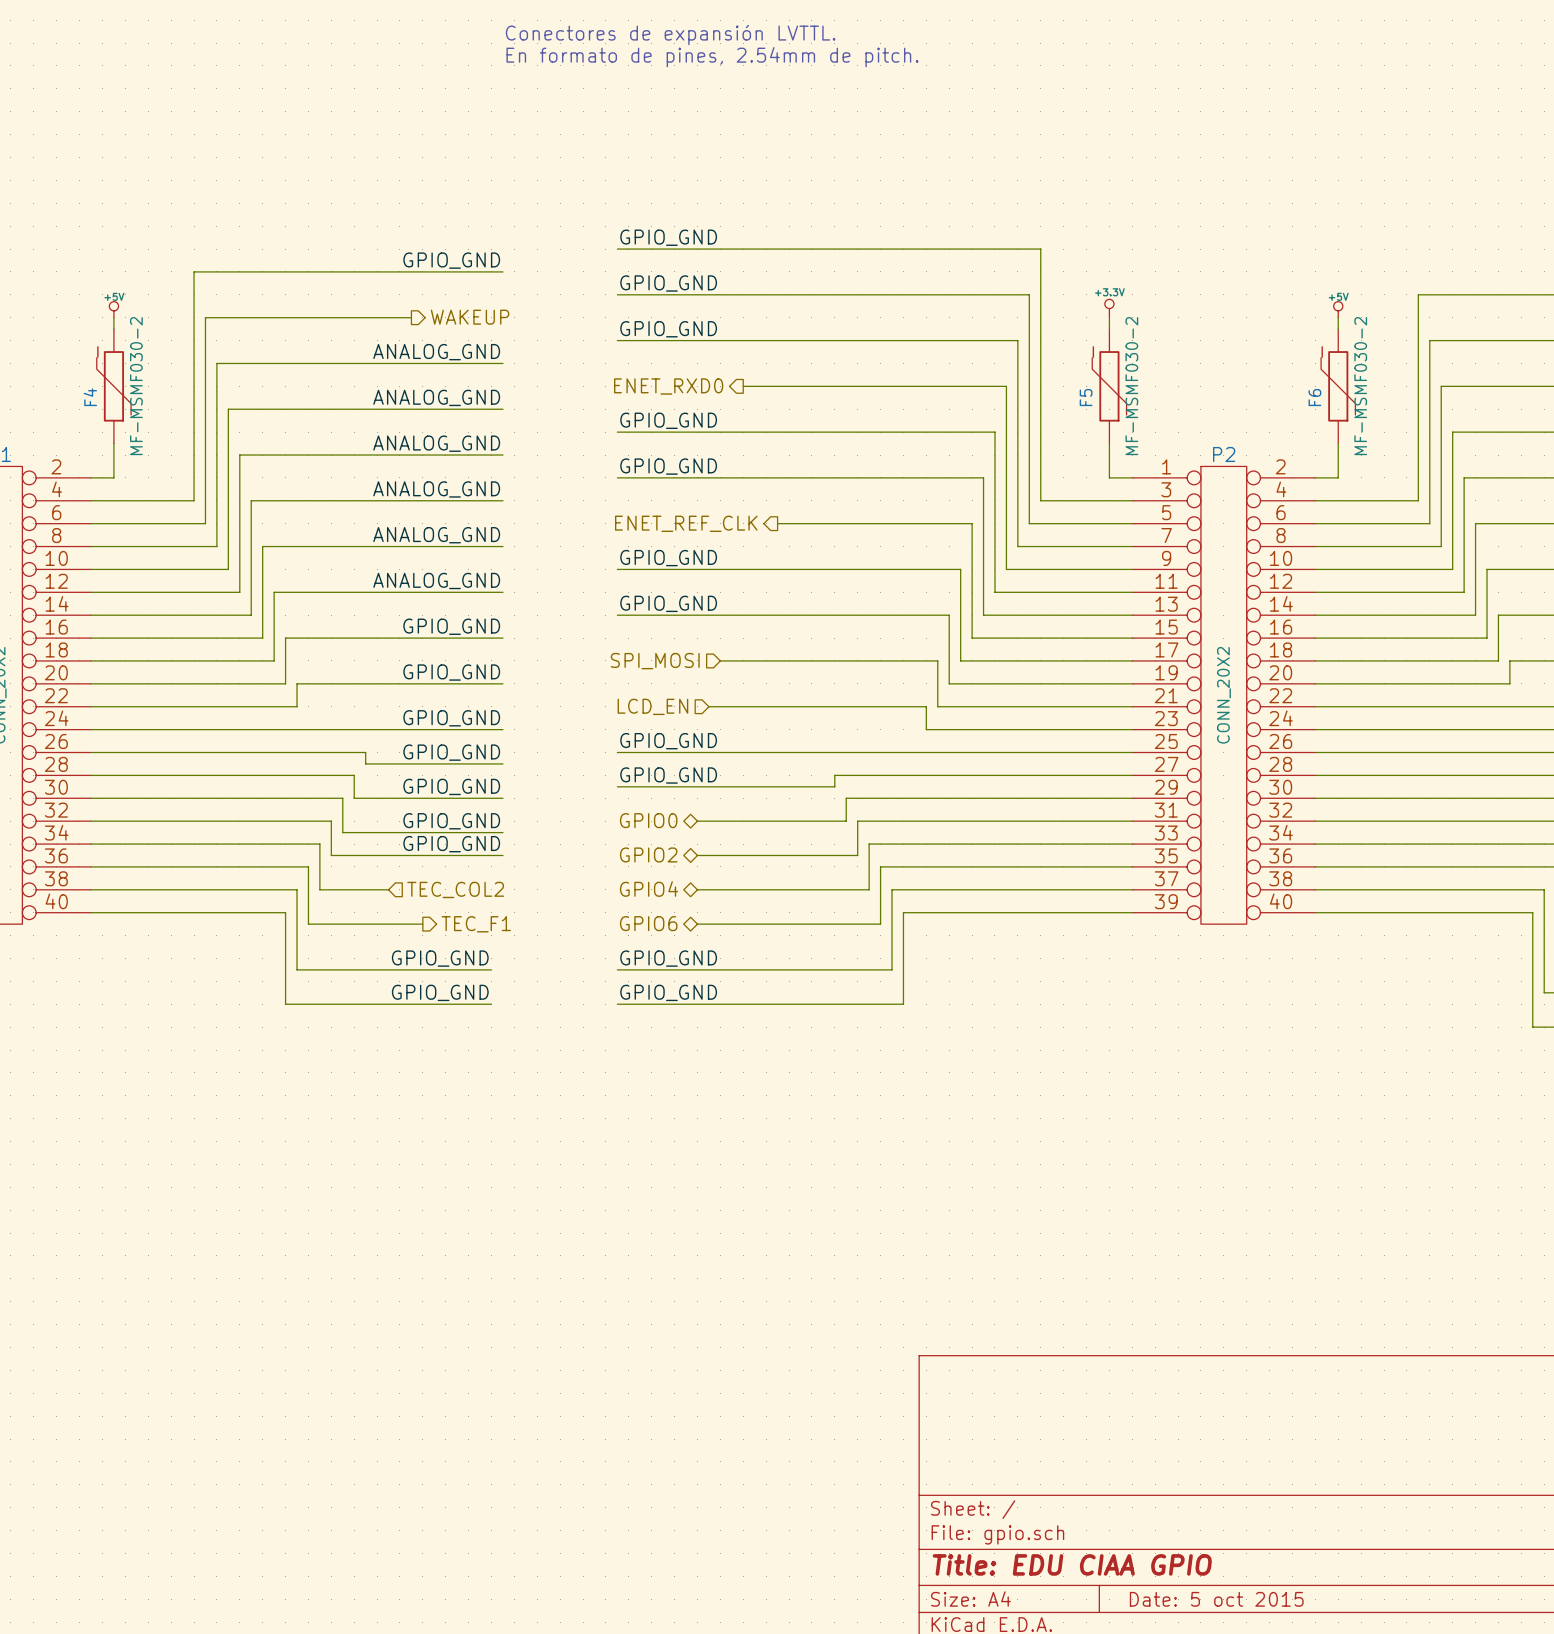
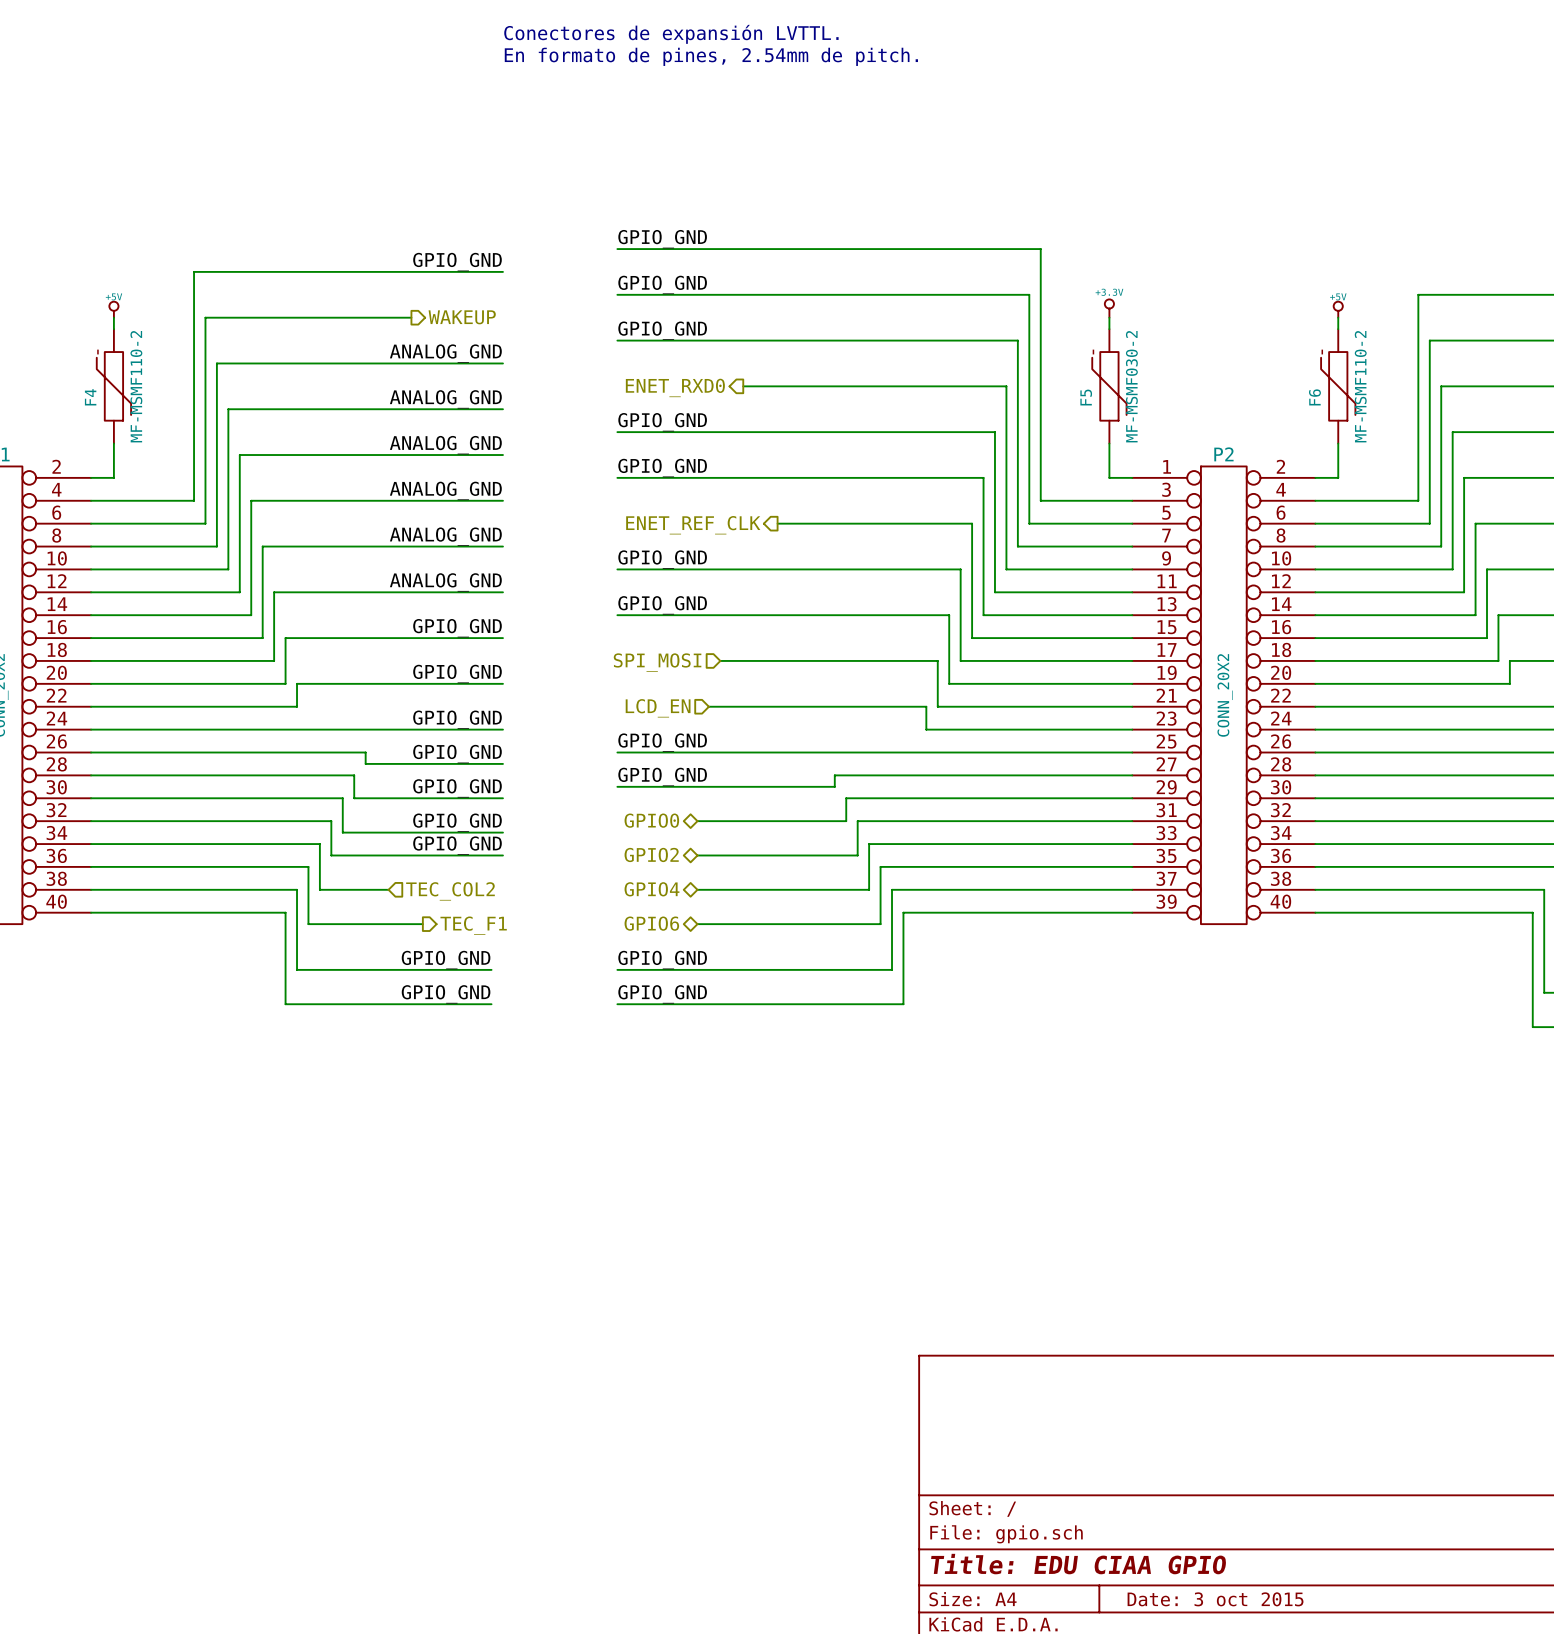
F4 value: MF-MSMF030-2 (136, 386) -> MF-MSMF110-2 (136, 386)
F6 value: MF-MSMF030-2 (1360, 386) -> MF-MSMF110-2 (1360, 386)
title block: Date: 5 oct 2015 (1216, 1599) -> Date: 3 oct 2015 (1215, 1599)

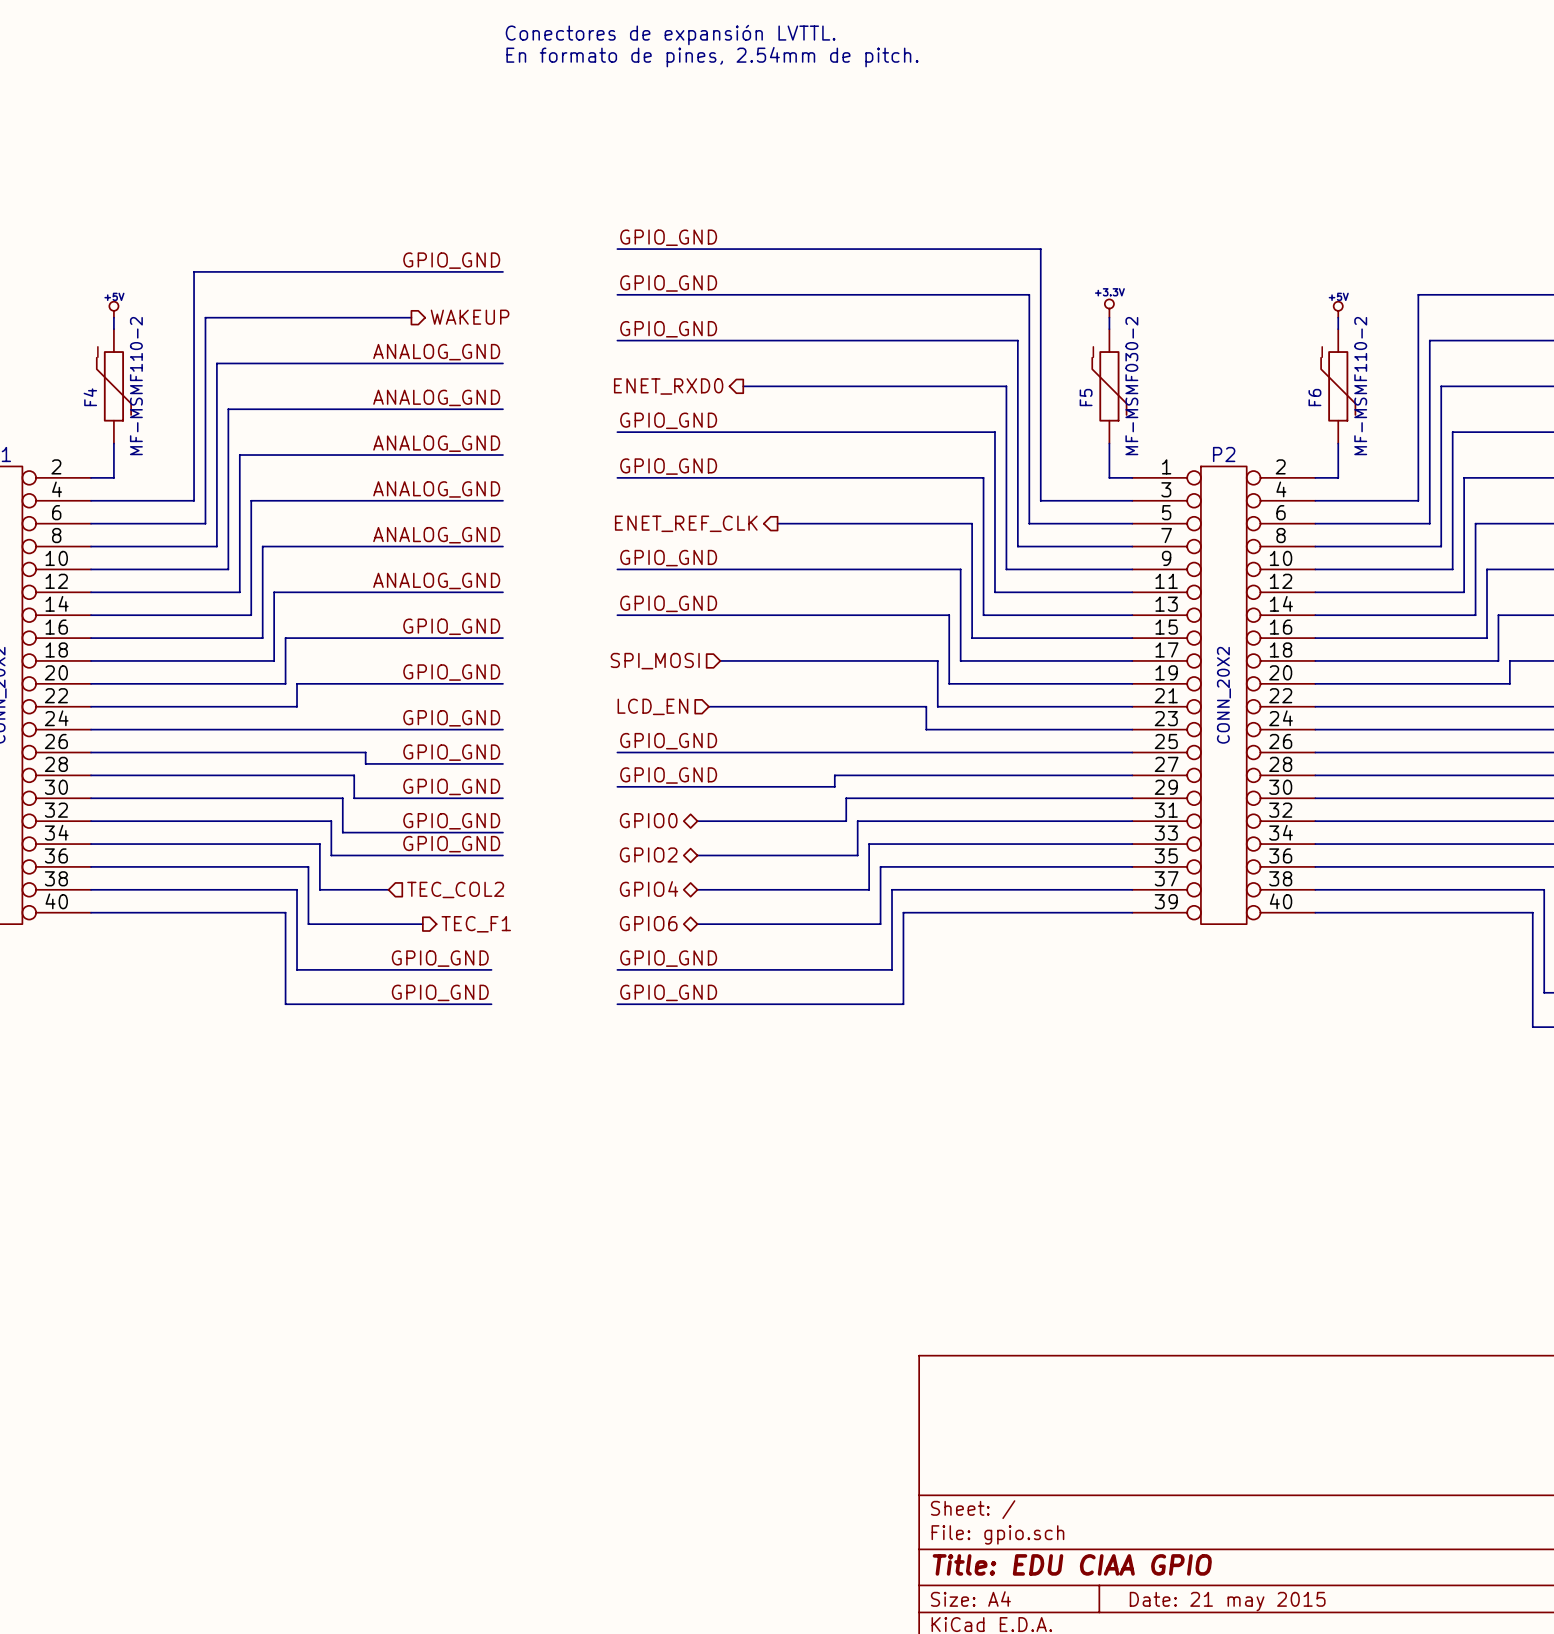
title block: Date: 3 oct 2015 (1215, 1599) -> Date: 21 may 2015 (1227, 1601)

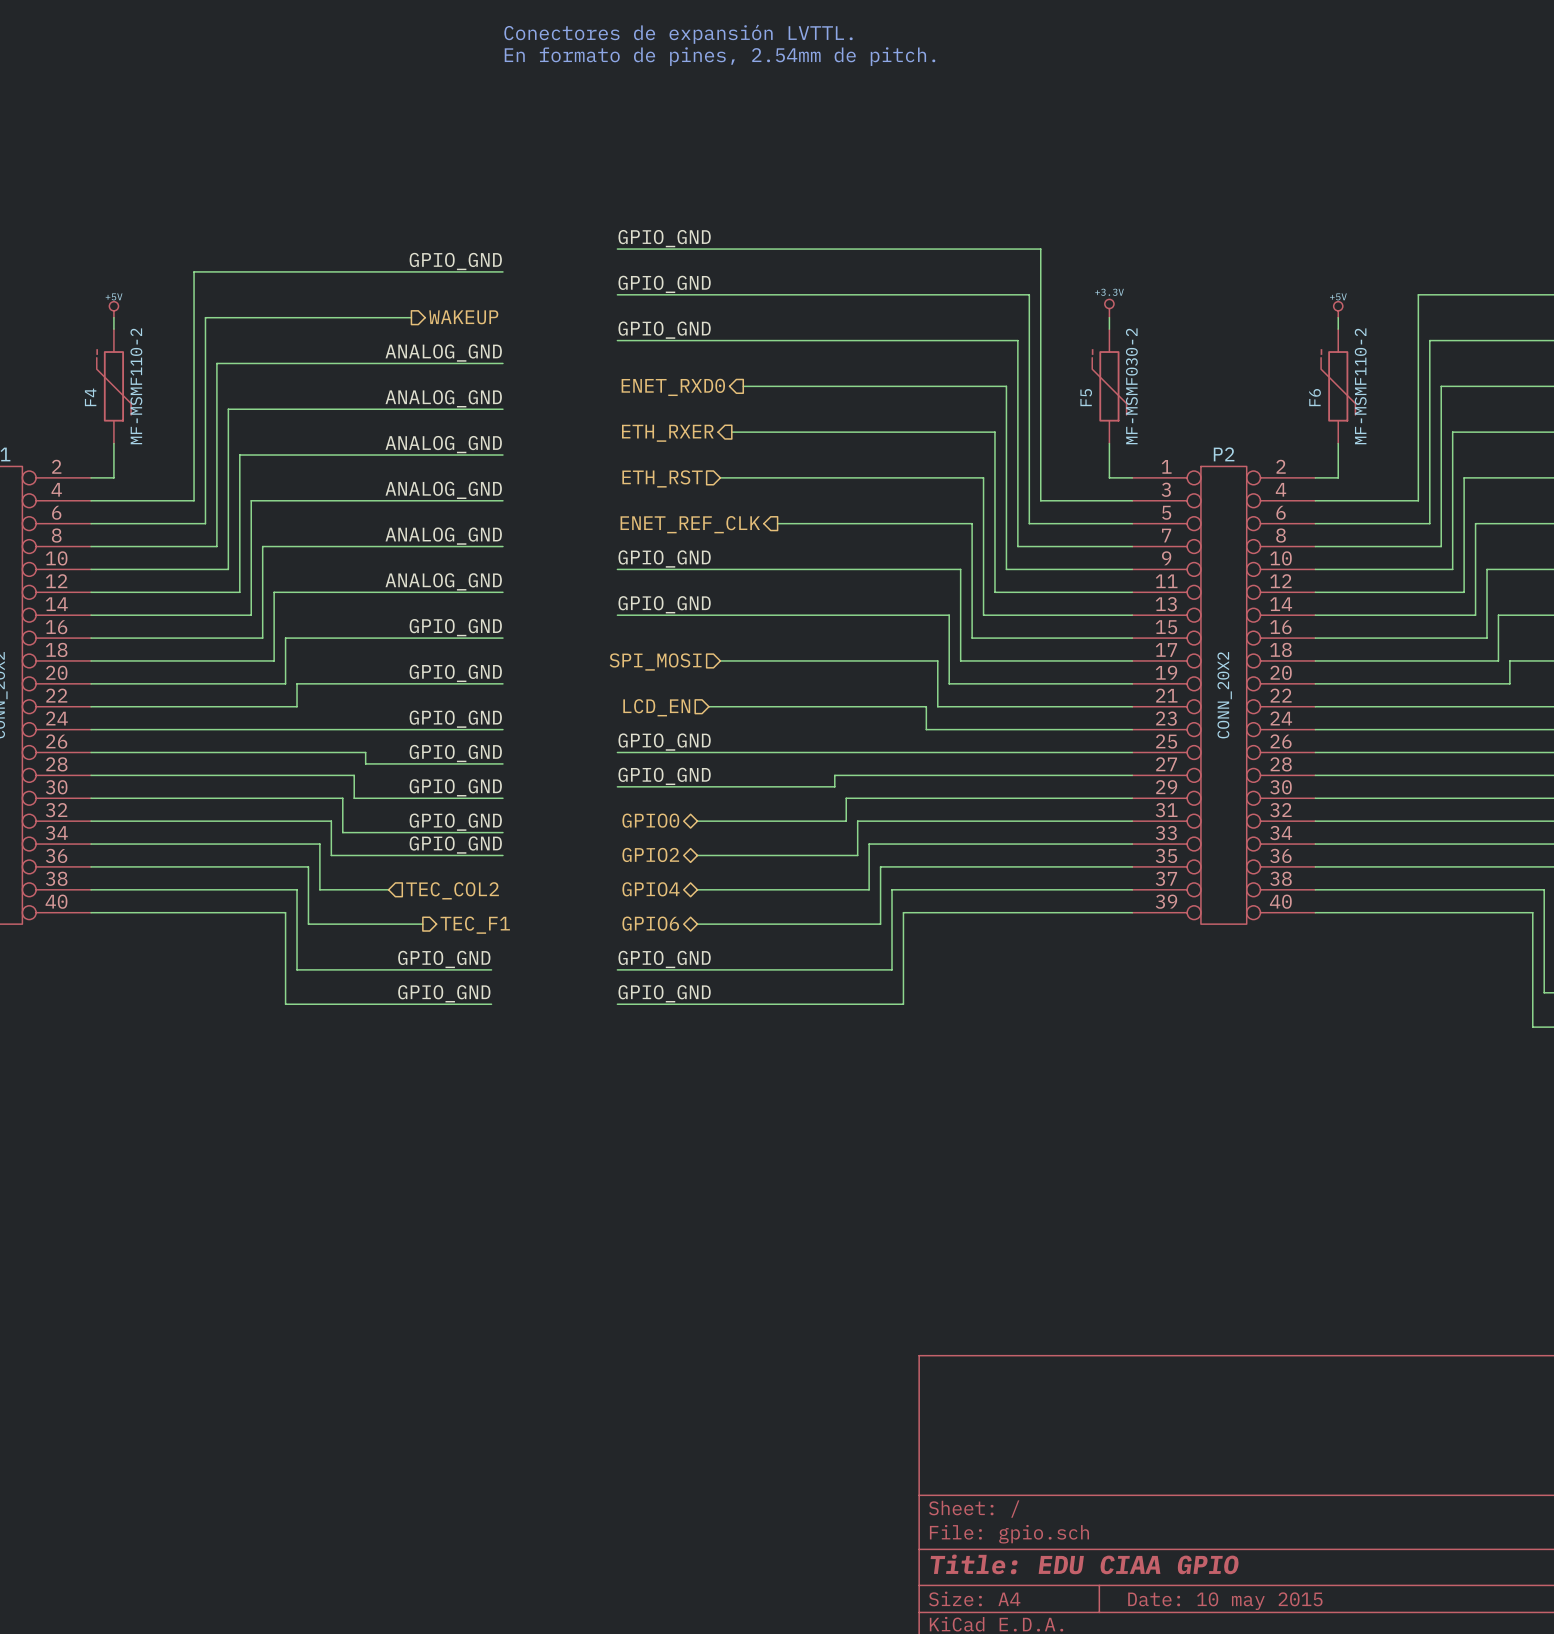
label: GPIO_GND (668, 420) -> none
wire: (617, 432) (731, 432) -> none
hierarchical label: none -> ETH_RXER (667, 433)
label: GPIO_GND (668, 466) -> none
wire: (617, 477) (720, 477) -> none
hierarchical label: none -> ETH_RST (662, 478)
title block: Date: 21 may 2015 (1227, 1601) -> Date: 10 may 2015 (1225, 1601)

